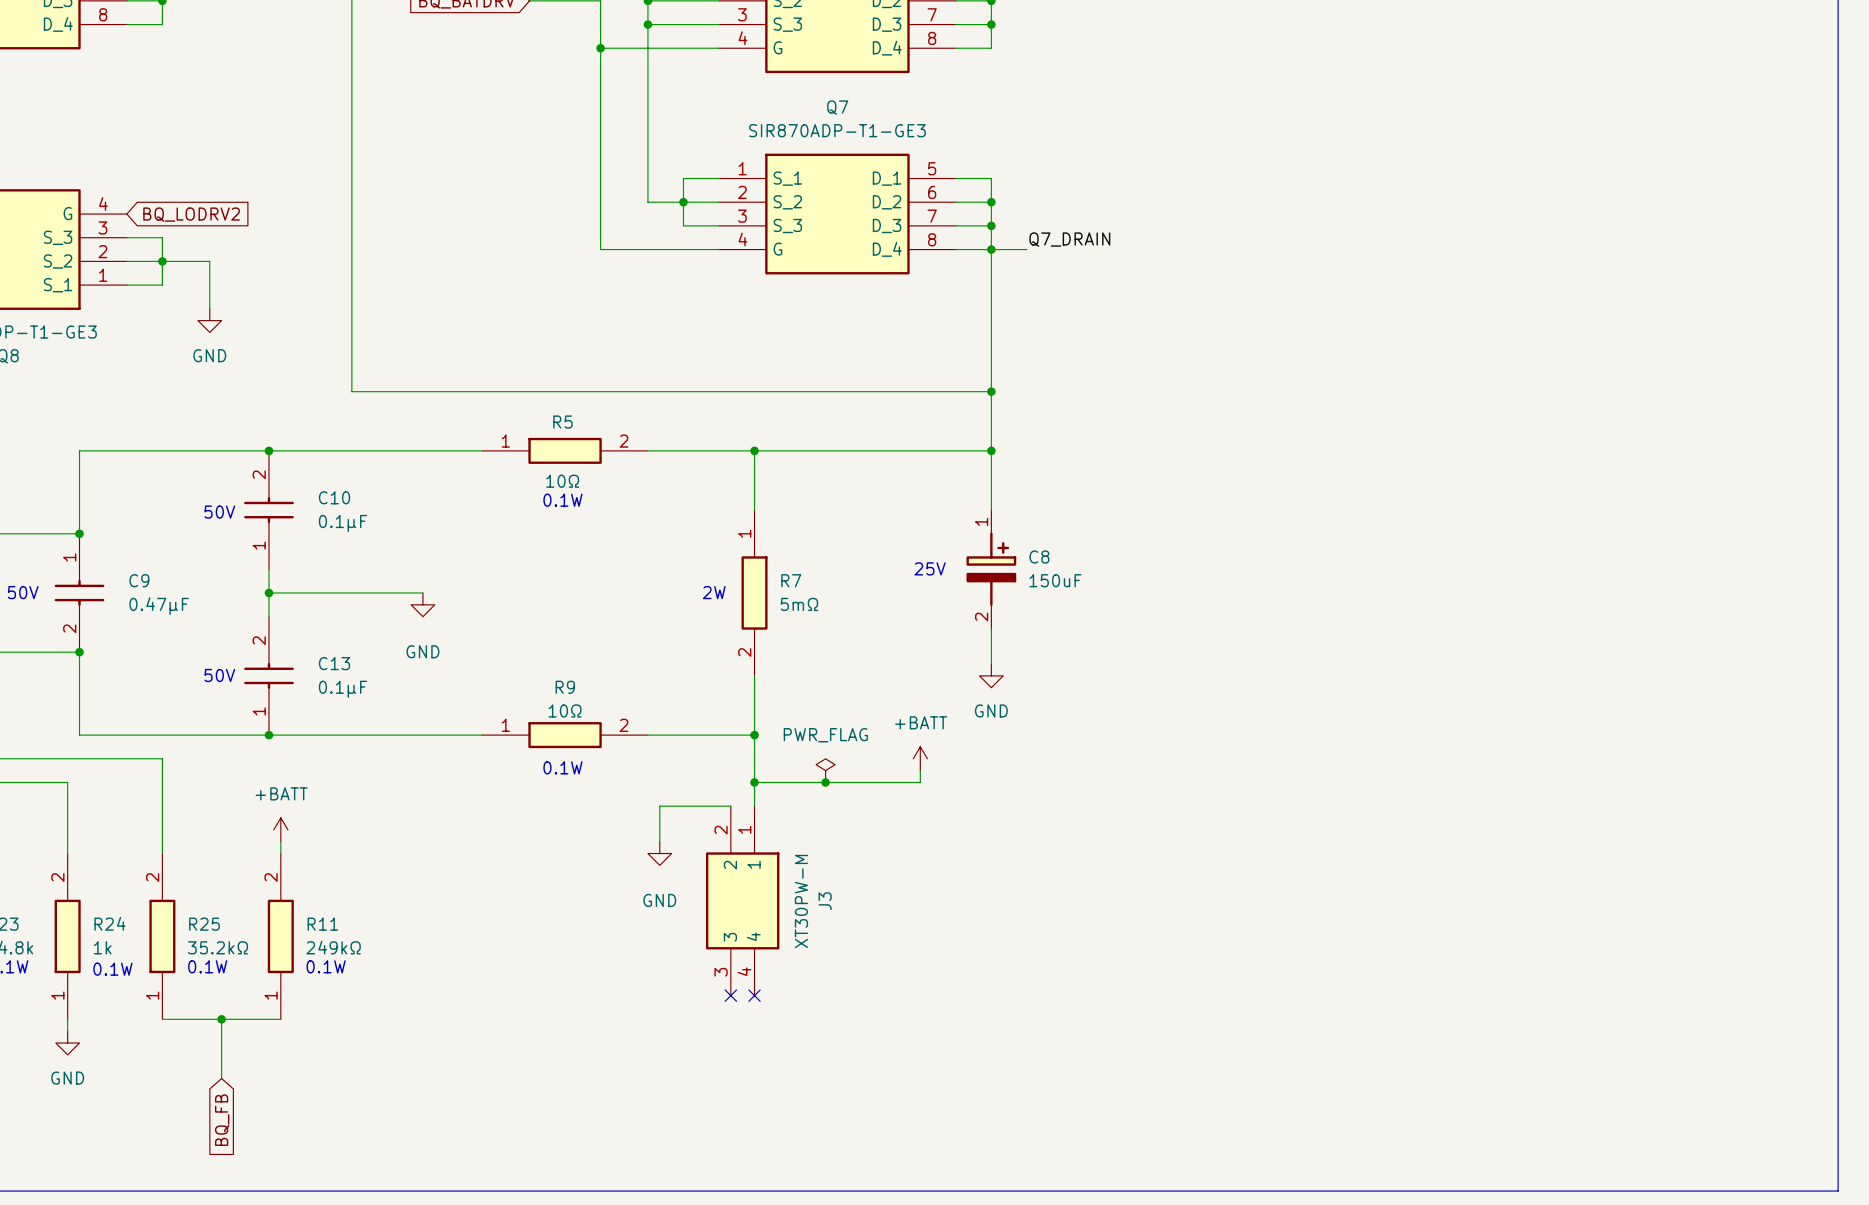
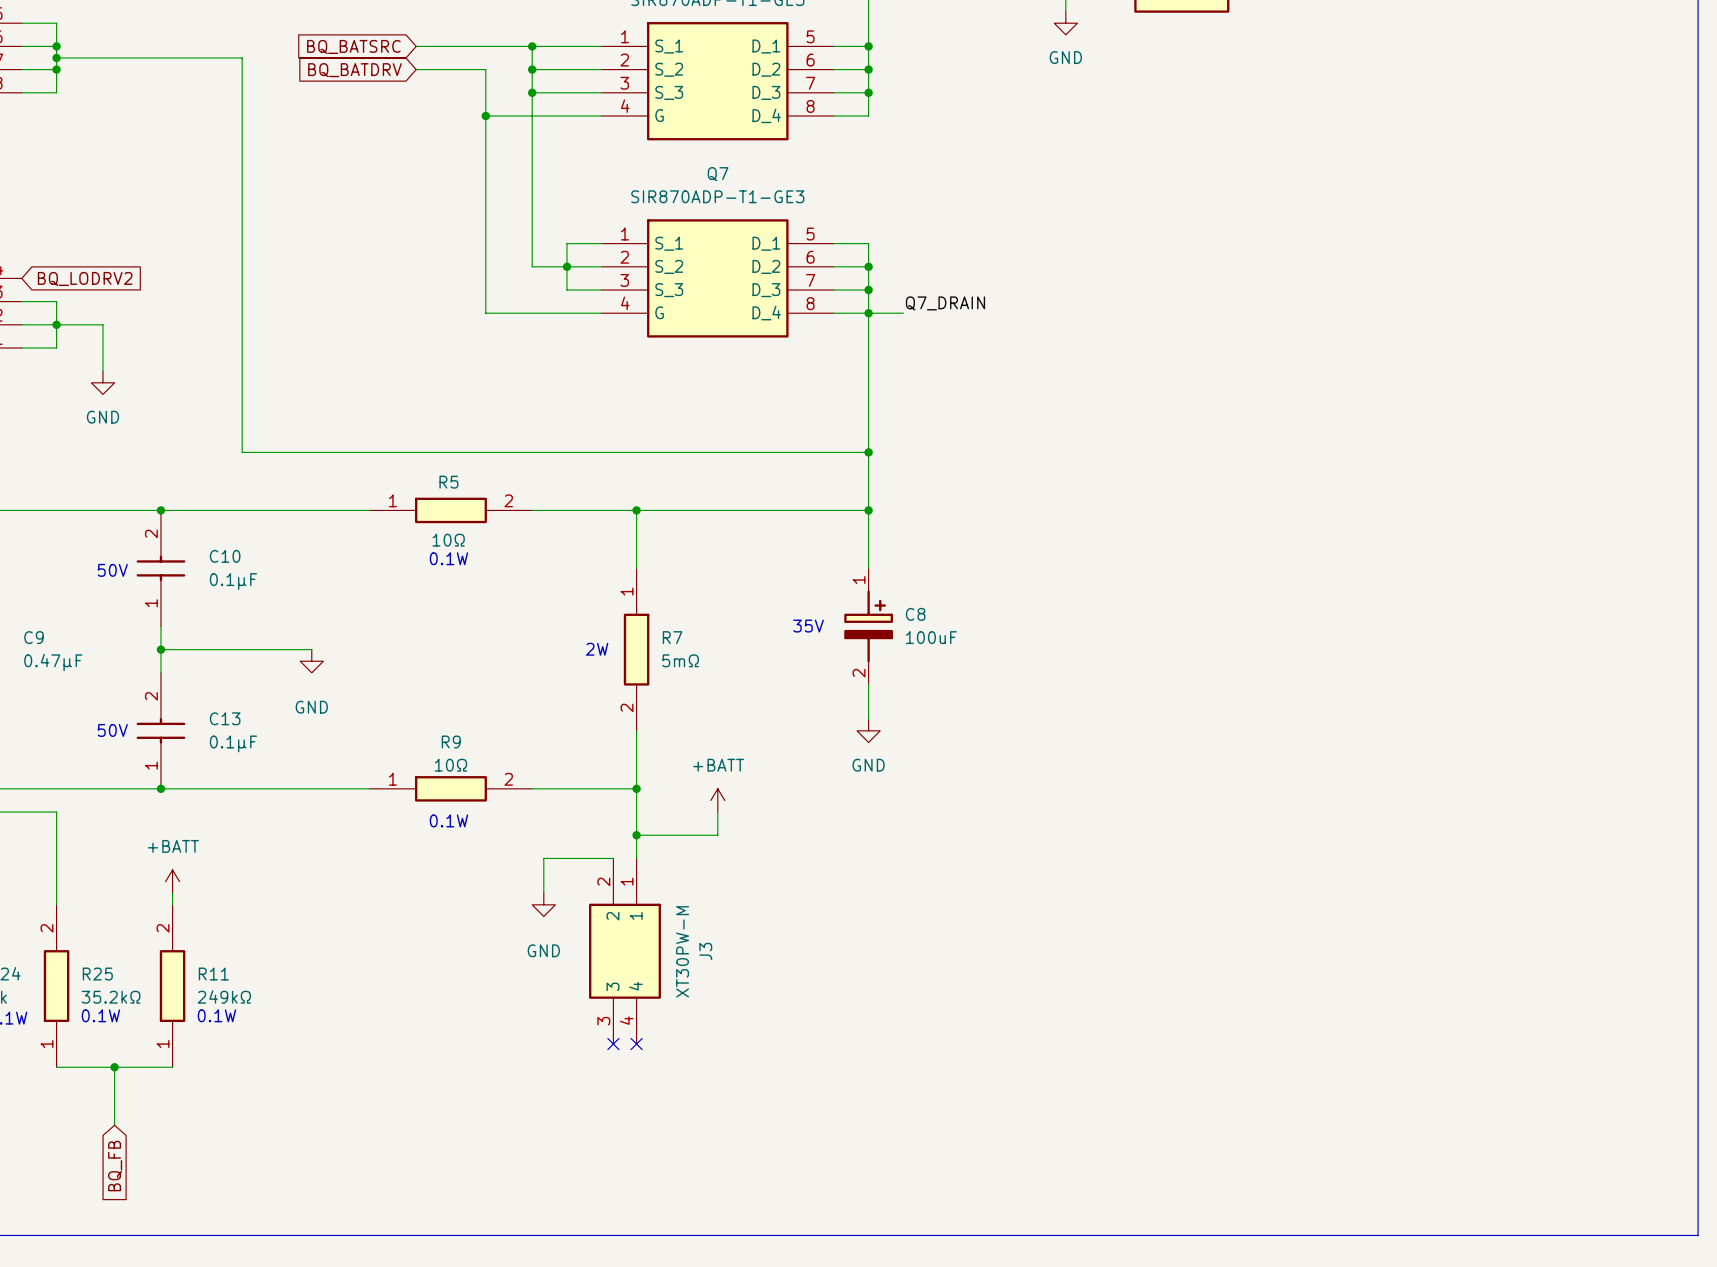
text: 25V (930, 568) -> 35V (808, 626)
C8 value: 150uF (1055, 580) -> 100uF (931, 637)
power symbol position: +BATT (920, 758) -> +BATT (717, 800)
power symbol: PWR_FLAG (825, 770) -> none
wire: (920, 770) (920, 782) (837, 782) -> (717, 812) (717, 835)
junction: (825, 782) -> none

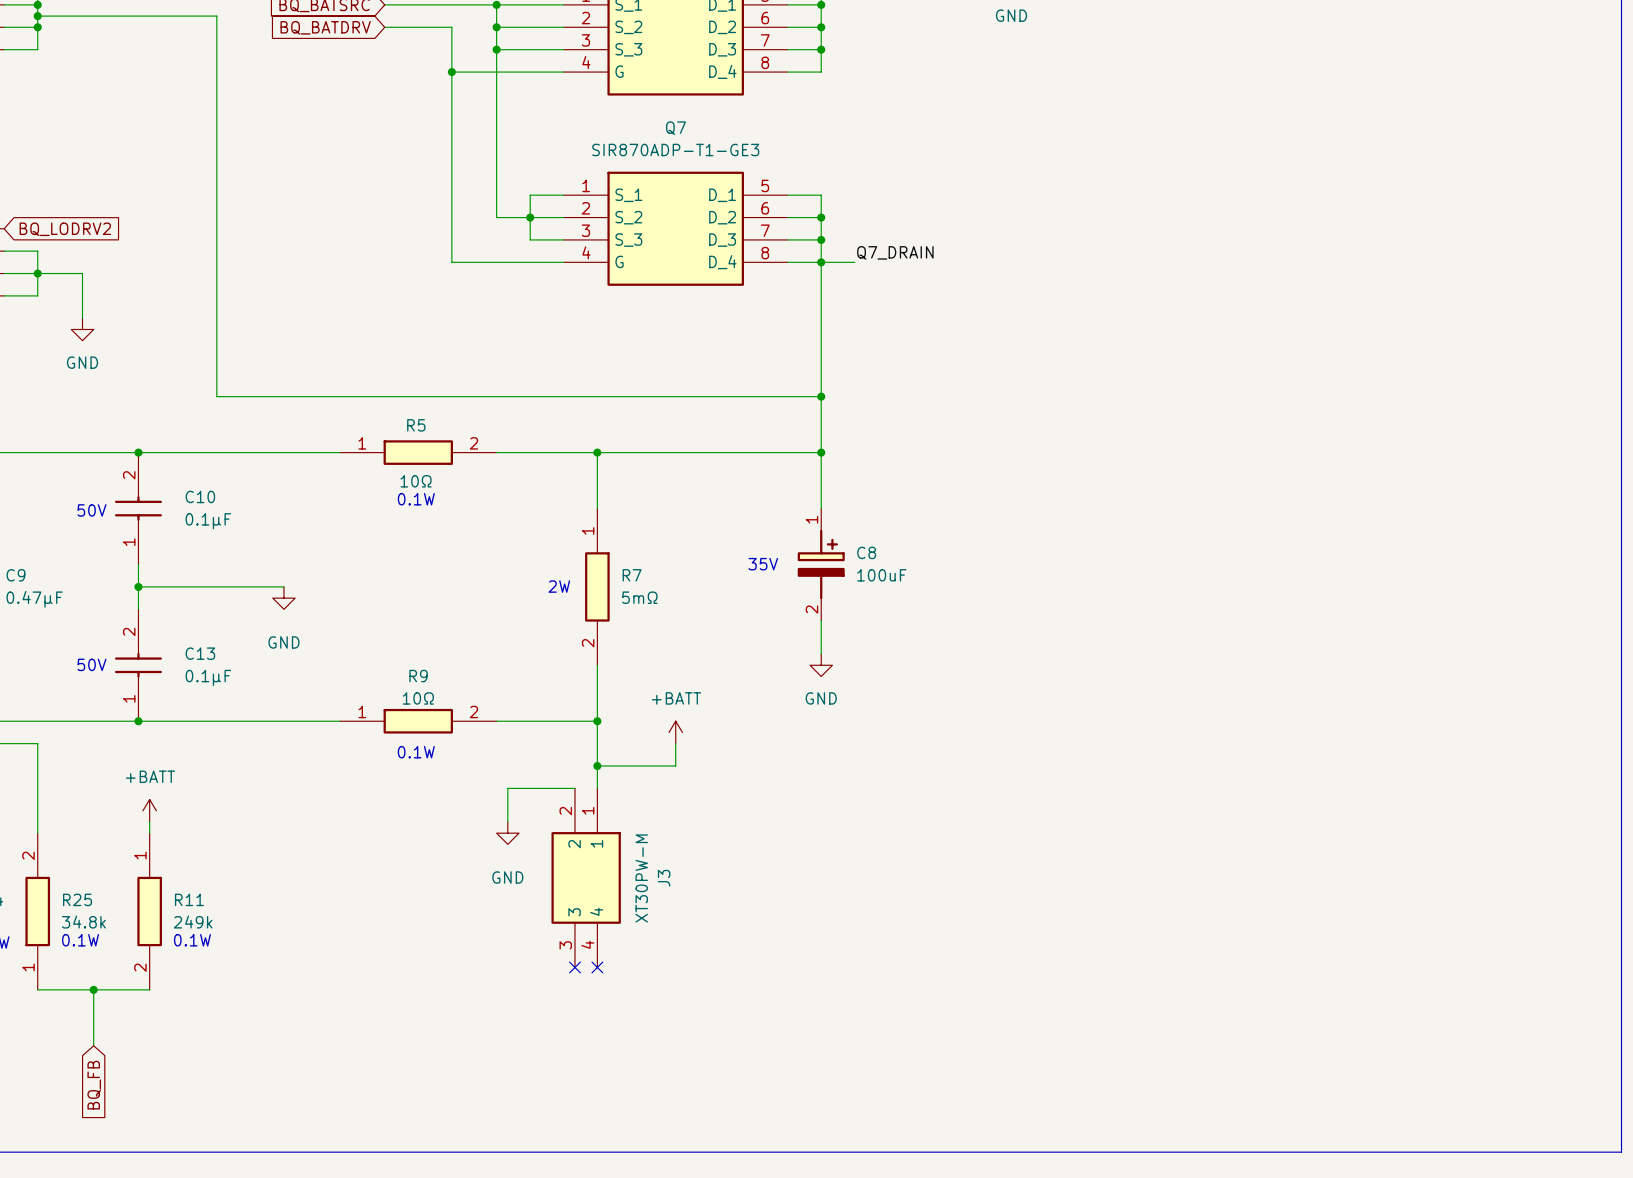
R11 rotation: 0° (172, 986) -> 180° (149, 911)
R11 value: 249kΩ (224, 996) -> 249k (193, 922)
R25 value: 35.2kΩ (111, 997) -> 34.8k (83, 922)

